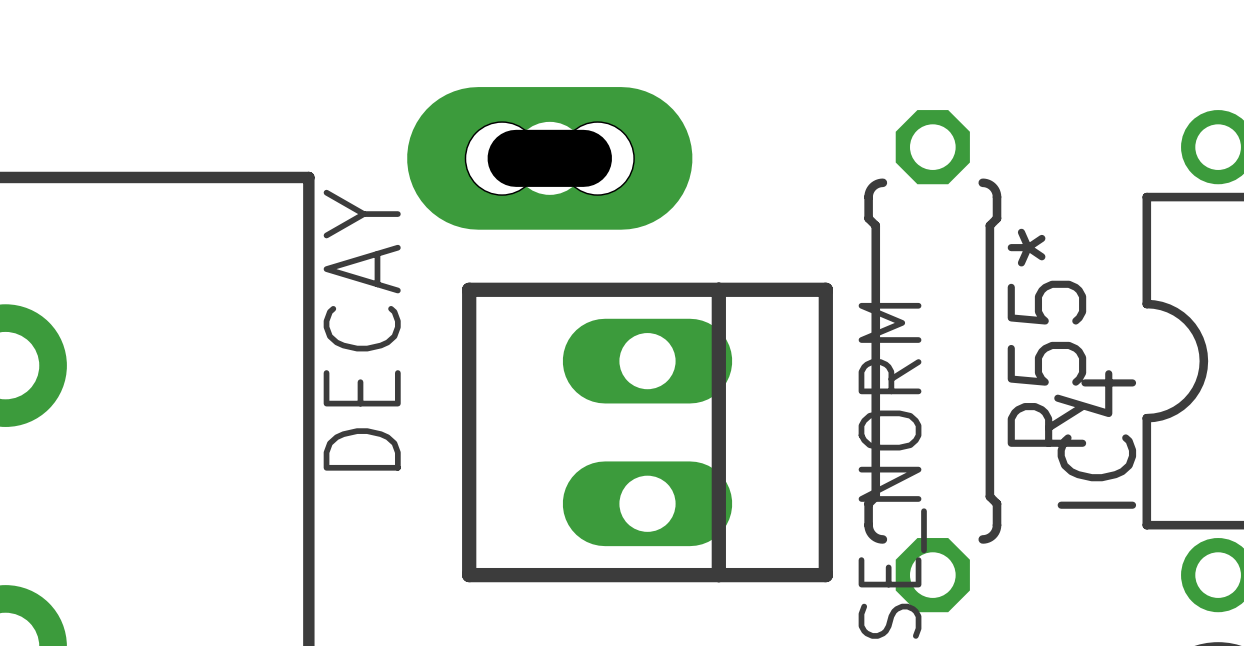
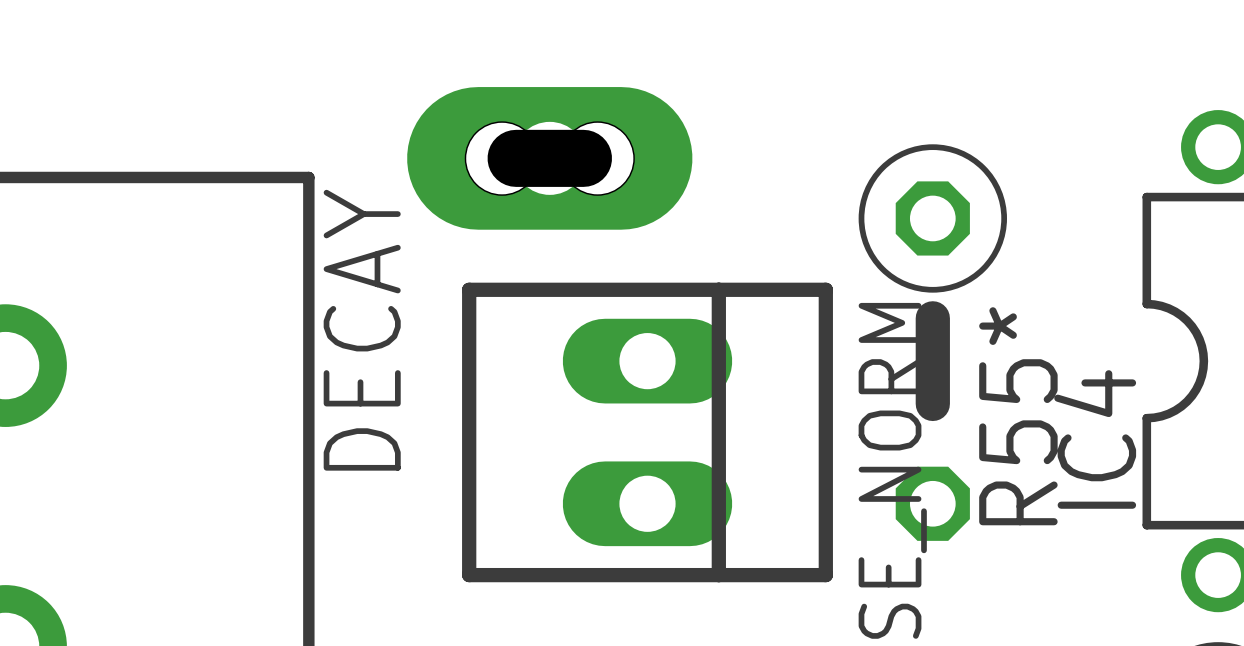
R55* footprint: [864, 110, 1002, 613] -> [858, 144, 1008, 541]

